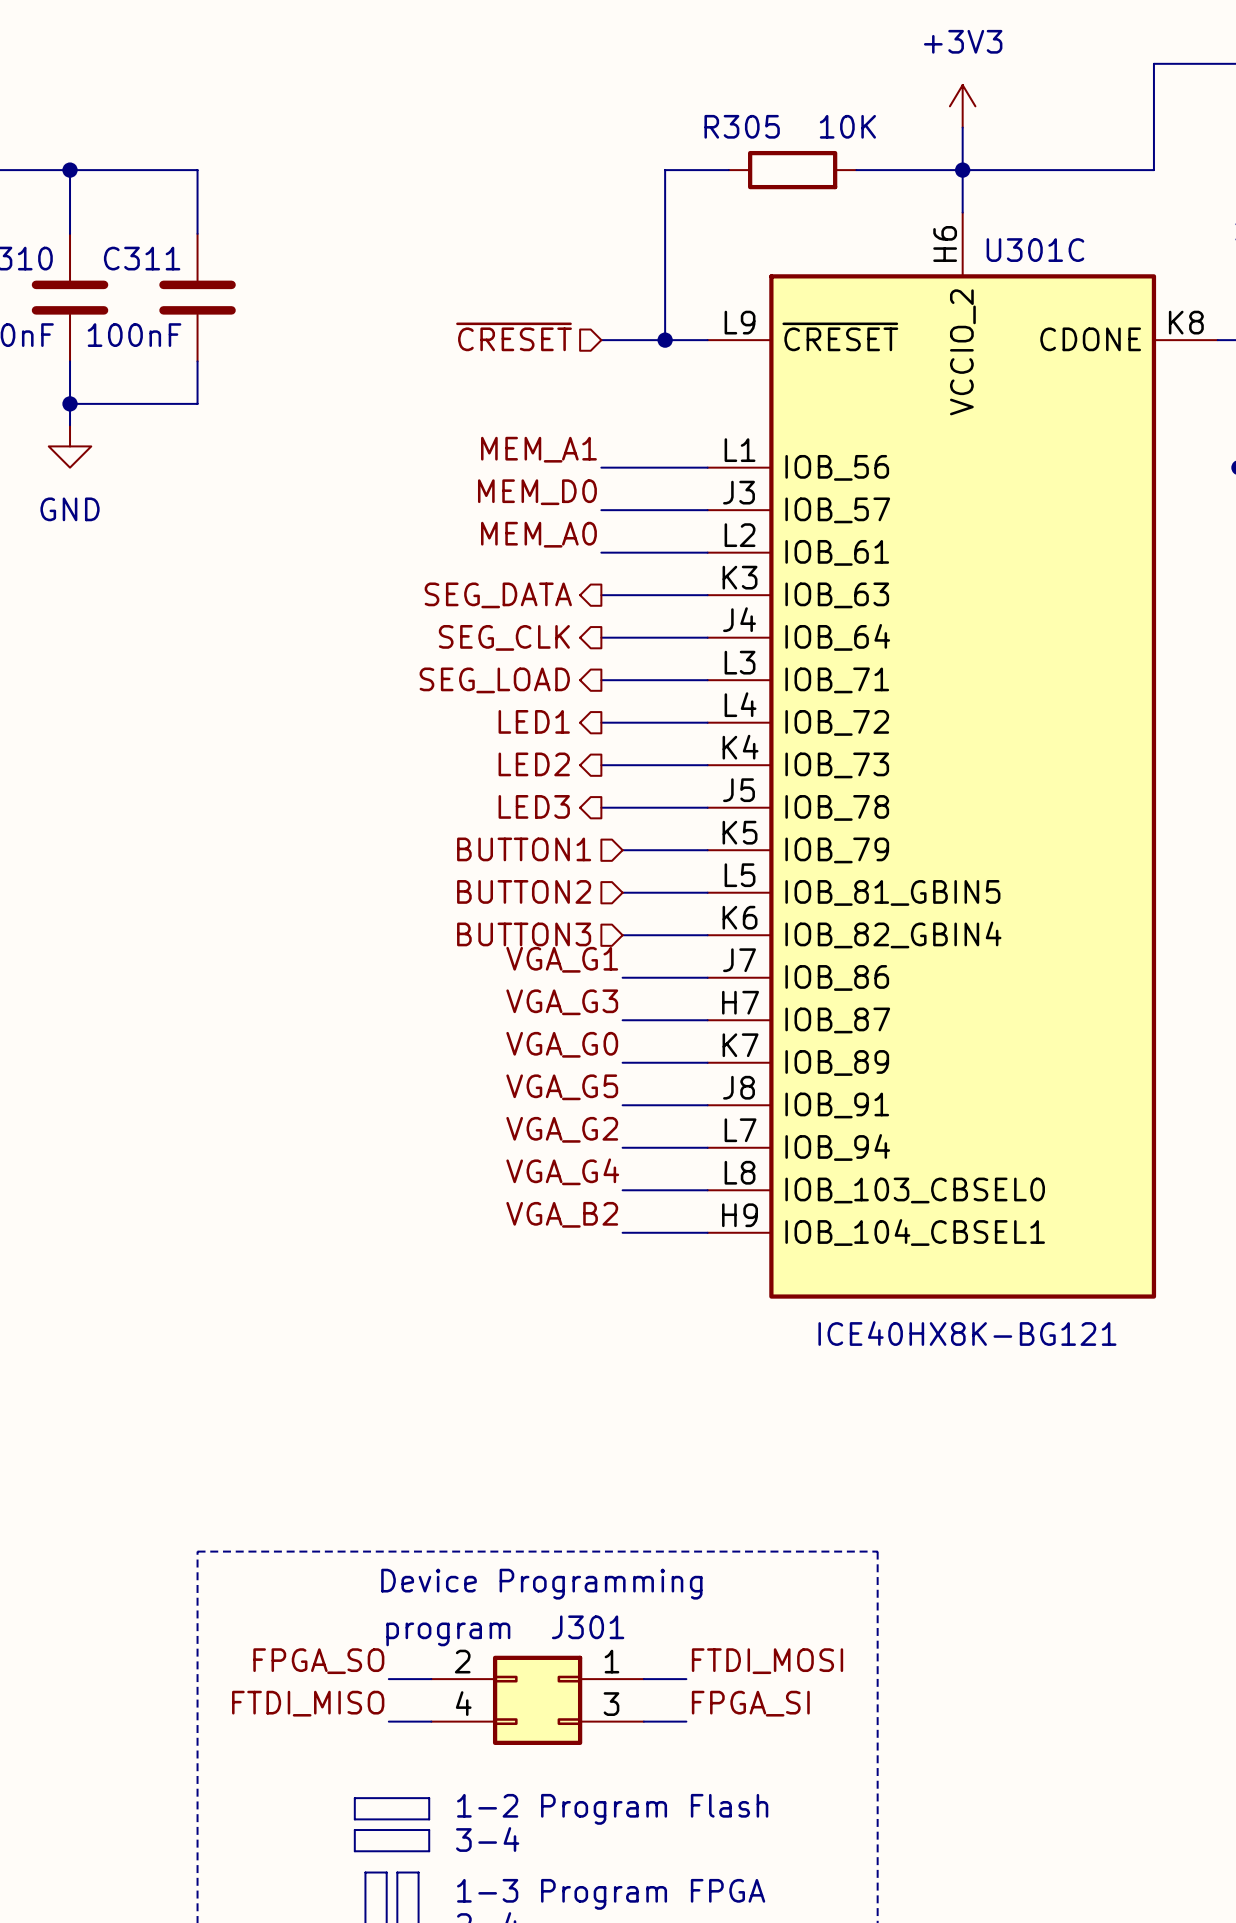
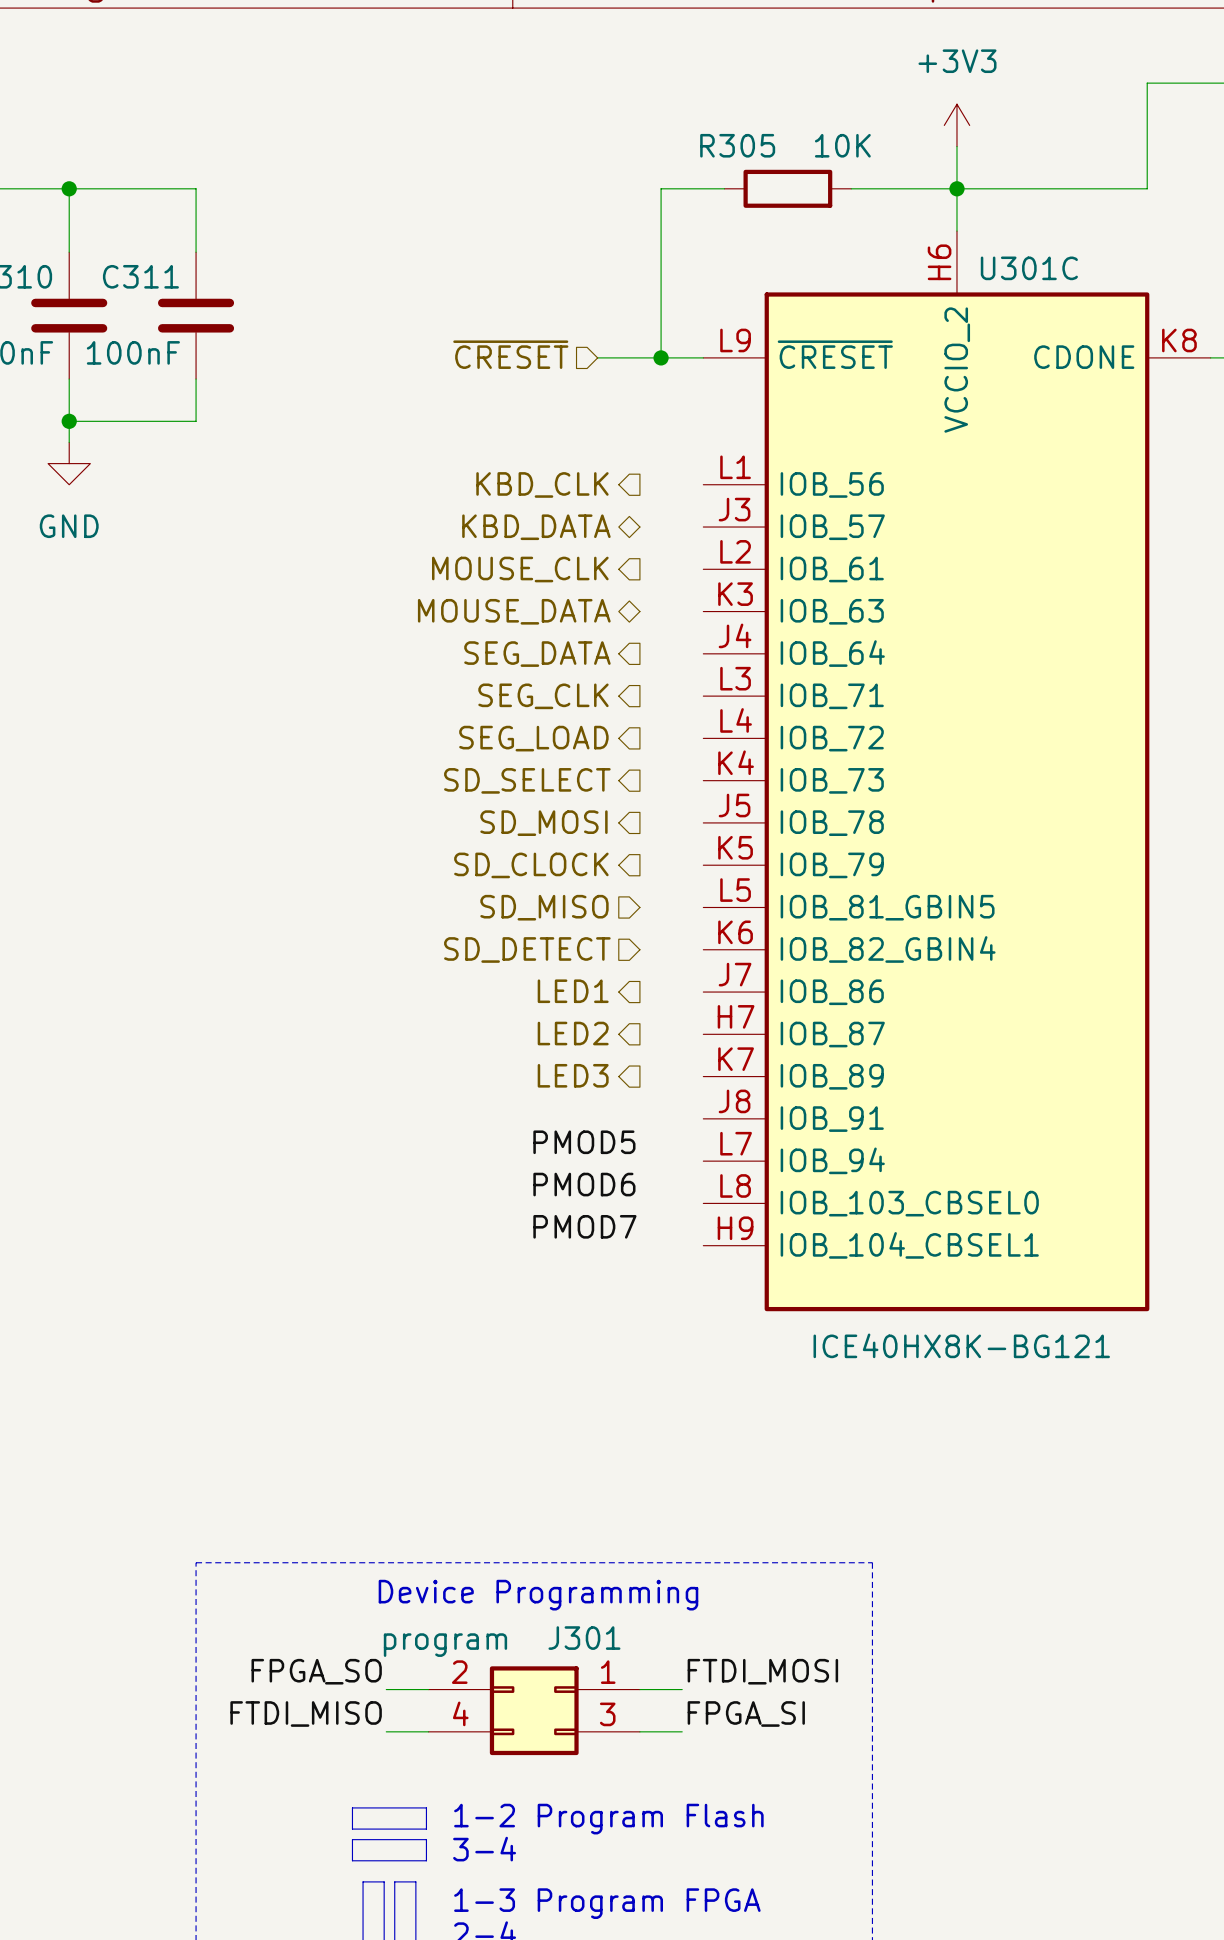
label: MEM_A1 (538, 449) -> none
hierarchical label: none -> KBD_CLK (542, 484)
wire: (601, 467) (707, 467) -> none
label: MEM_D0 (537, 492) -> none
hierarchical label: none -> KBD_DATA (536, 527)
wire: (601, 510) (707, 510) -> none
label: MEM_A0 (538, 534) -> none
hierarchical label: none -> MOUSE_CLK (520, 569)
wire: (601, 552) (707, 552) -> none
hierarchical label position: SEG_DATA (498, 595) -> SEG_DATA (537, 654)
hierarchical label: none -> MOUSE_DATA (514, 611)
wire: (601, 595) (707, 595) -> none
hierarchical label position: SEG_CLK (504, 637) -> SEG_CLK (543, 696)
wire: (601, 637) (707, 637) -> none
hierarchical label position: SEG_LOAD (494, 680) -> SEG_LOAD (533, 738)
wire: (601, 680) (707, 680) -> none
hierarchical label position: LED1 (534, 721) -> LED1 (573, 991)
wire: (601, 722) (707, 722) -> none
hierarchical label position: LED2 (534, 764) -> LED2 (573, 1033)
hierarchical label: none -> SD_SELECT (527, 780)
wire: (601, 765) (707, 765) -> none
hierarchical label position: LED3 (534, 806) -> LED3 (573, 1075)
hierarchical label: none -> SD_MOSI (543, 823)
wire: (601, 807) (707, 807) -> none
hierarchical label: BUTTON1 (524, 849) -> none
hierarchical label: none -> SD_CLOCK (531, 865)
wire: (622, 850) (707, 850) -> none
hierarchical label: BUTTON2 (524, 891) -> none
hierarchical label: none -> SD_MISO (544, 907)
wire: (622, 892) (707, 892) -> none
hierarchical label: BUTTON3 (524, 934) -> none
hierarchical label: none -> SD_DETECT (527, 949)
wire: (622, 935) (707, 935) -> none
label: VGA_G1 (562, 959) -> none
wire: (622, 977) (707, 977) -> none
label: VGA_G3 (562, 1002) -> none
wire: (622, 1020) (707, 1020) -> none
label: VGA_G0 (562, 1044) -> none
wire: (622, 1062) (707, 1062) -> none
label: VGA_G5 (562, 1087) -> none
wire: (622, 1105) (707, 1105) -> none
label: none -> PMOD5 (584, 1142)
label: VGA_G2 (562, 1129) -> none
wire: (622, 1147) (707, 1147) -> none
label: VGA_G4 (562, 1171) -> none
label: none -> PMOD6 (584, 1184)
wire: (622, 1190) (707, 1190) -> none
label: none -> PMOD7 (584, 1226)
label: VGA_B2 (562, 1214) -> none
wire: (622, 1232) (707, 1232) -> none

